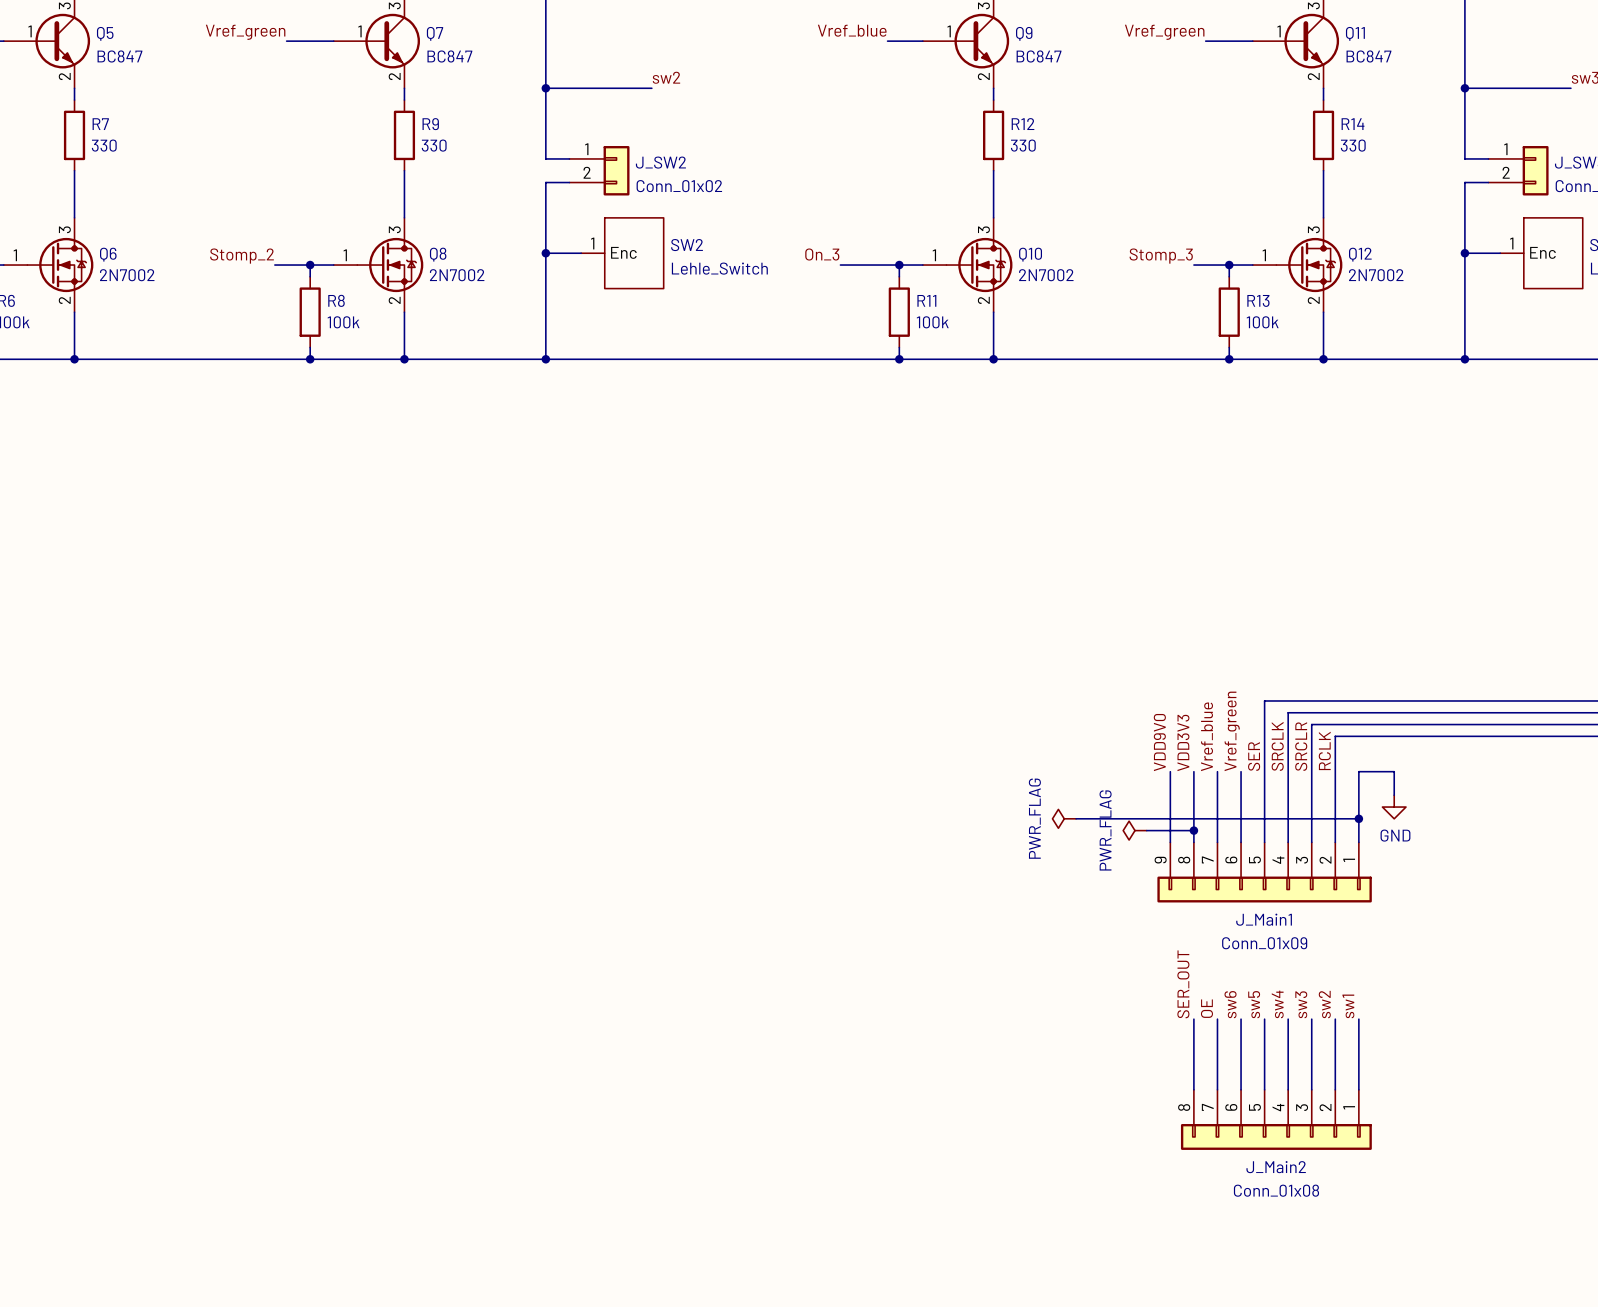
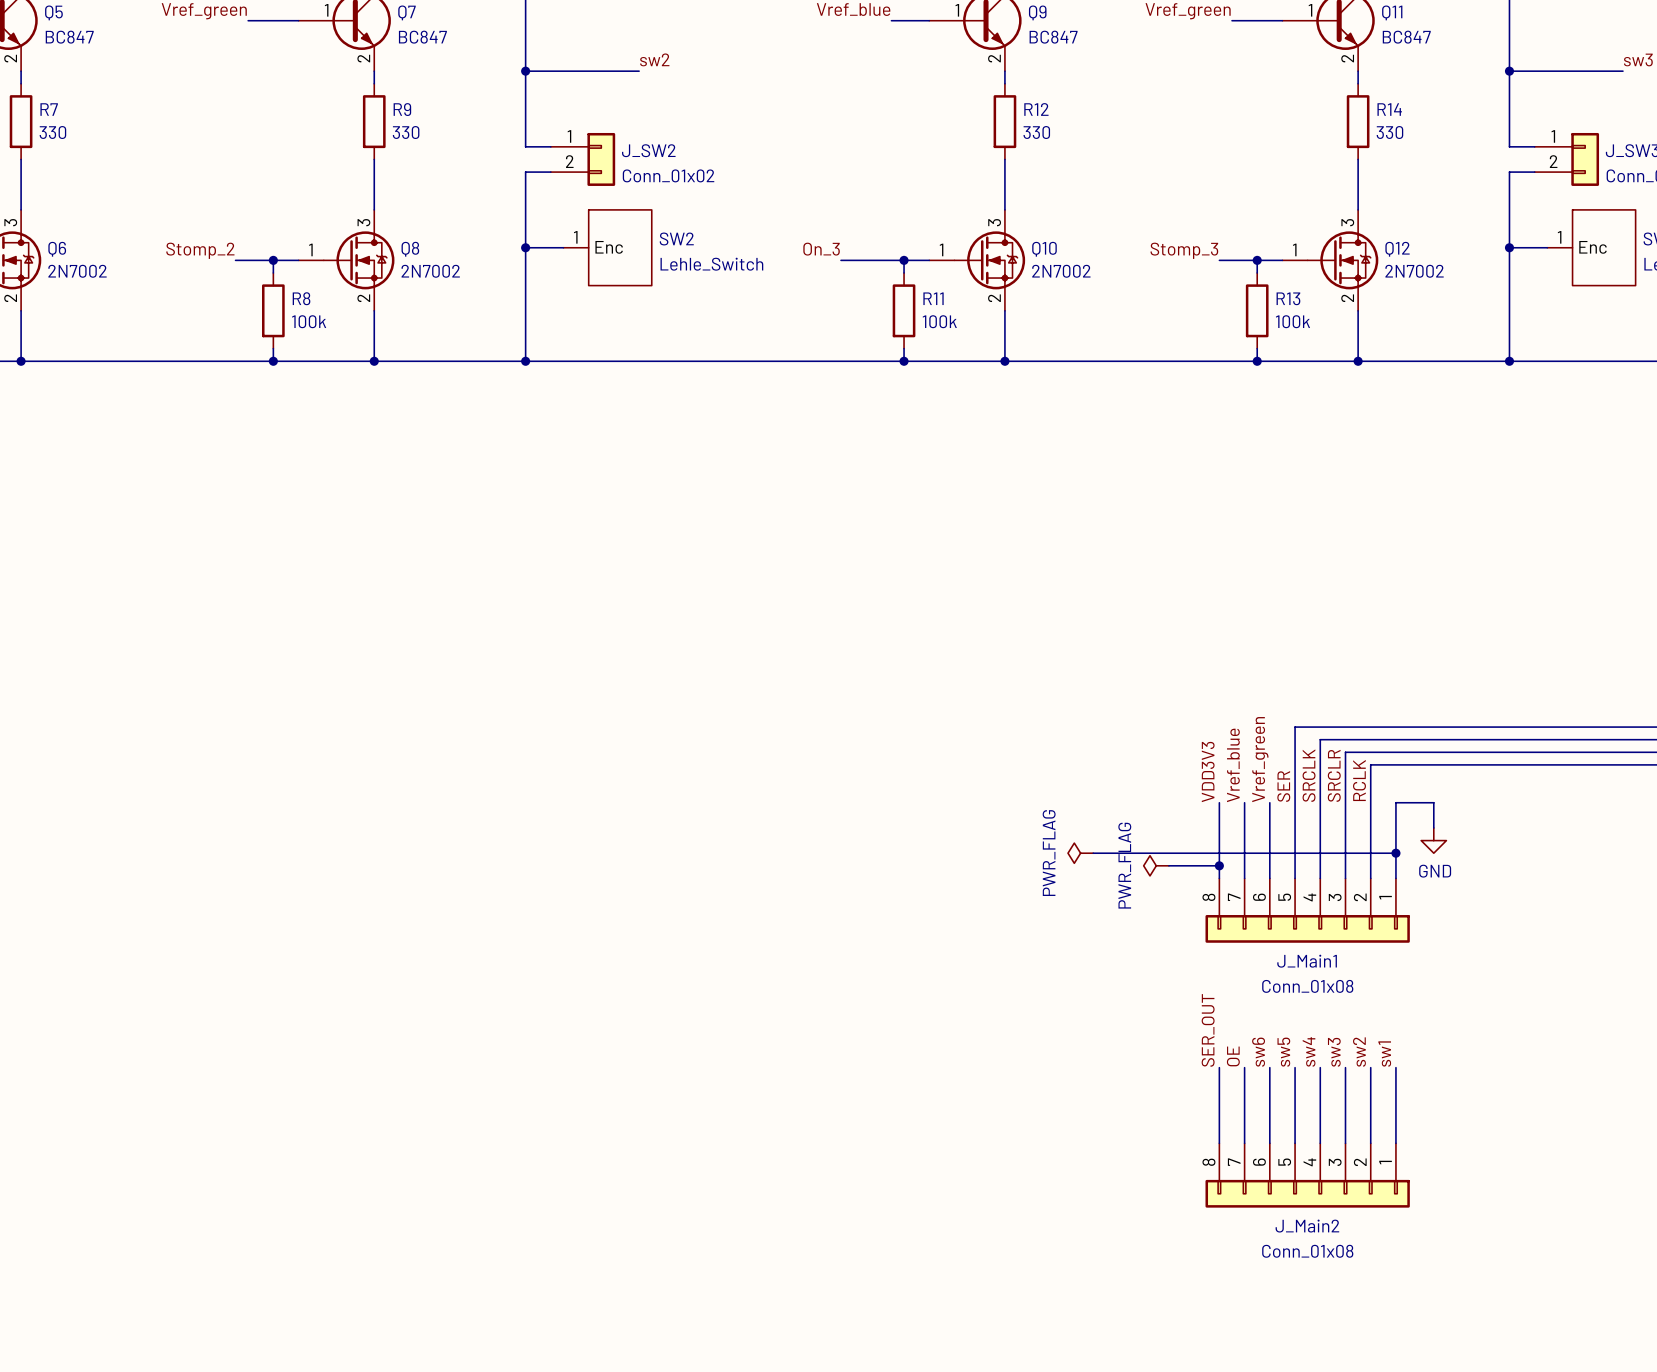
label: VDD9V0 (1159, 742) -> none
wire: (1170, 771) (1170, 842) -> none
J_Main1 symbol: [1157, 842, 1372, 903] -> [1205, 878, 1410, 943]
J_Main1 value: Conn_01x09 (1264, 943) -> Conn_01x08 (1307, 986)

